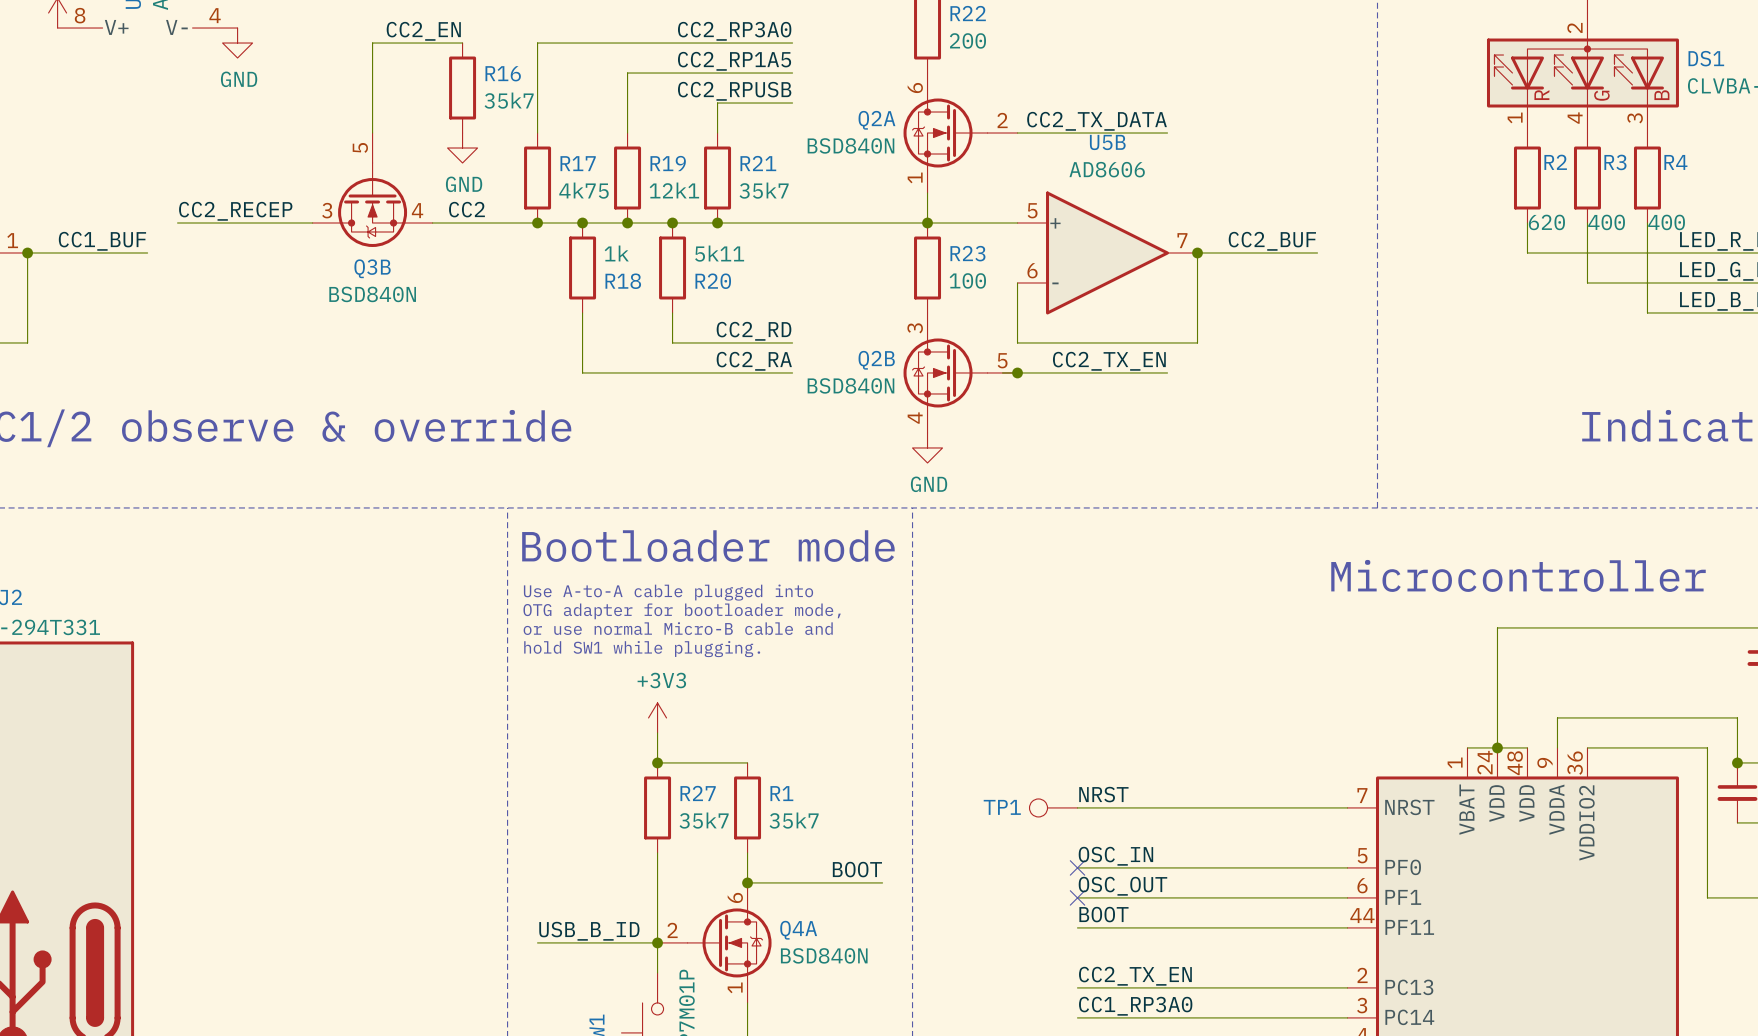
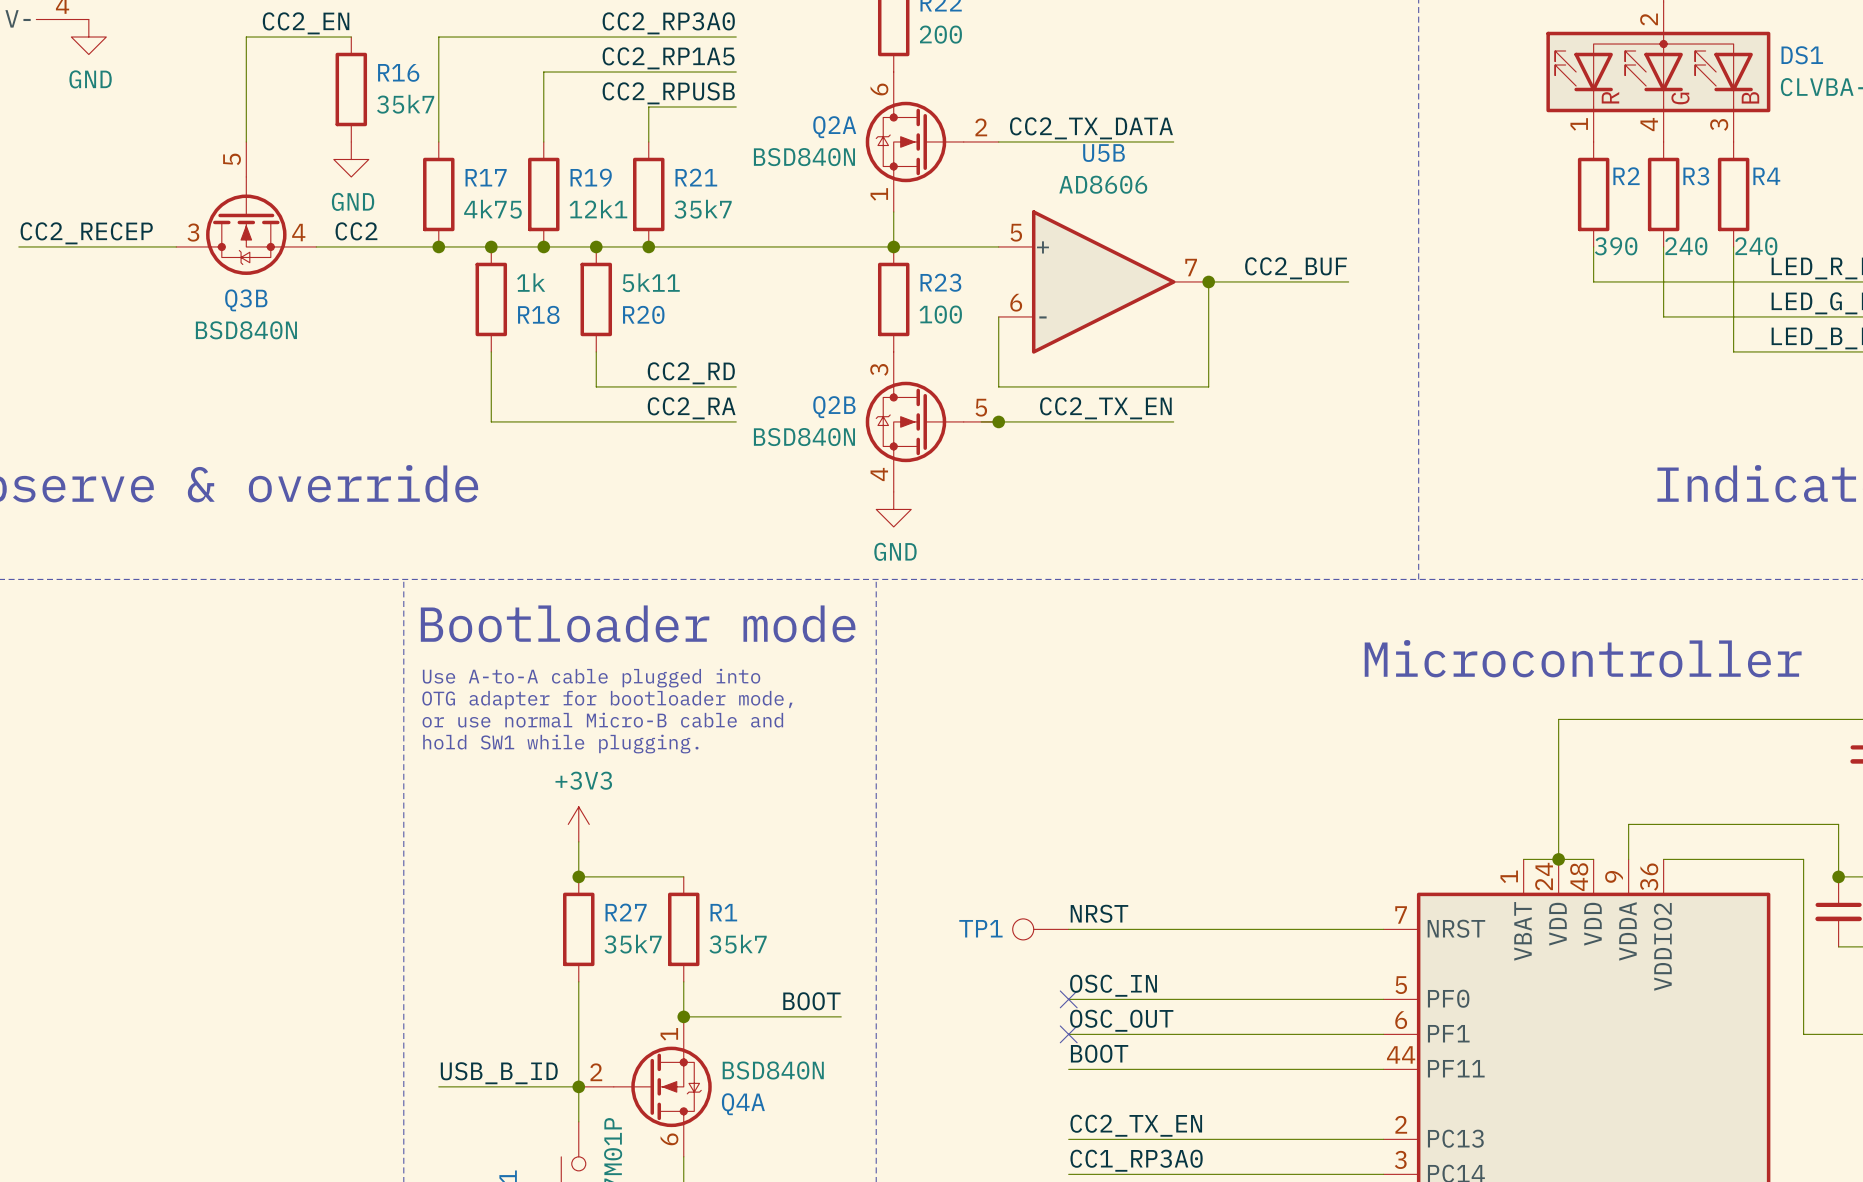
R2 value: 620 (1546, 222) -> 390 (1616, 246)
R3 value: 400 (1606, 222) -> 240 (1686, 246)
R4 value: 400 (1666, 222) -> 240 (1756, 246)
Q4A flip: as is (729, 942) -> up-down (662, 1086)

